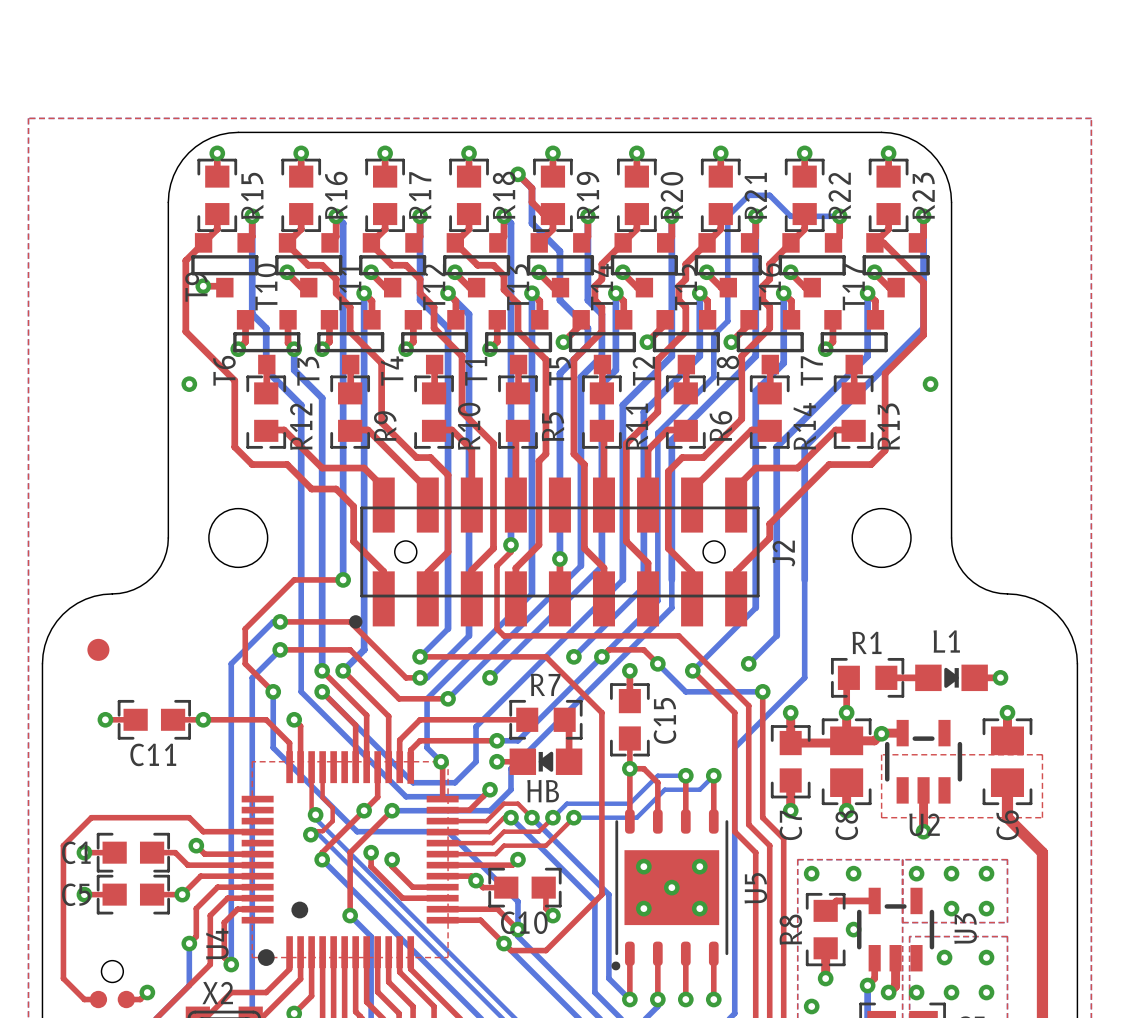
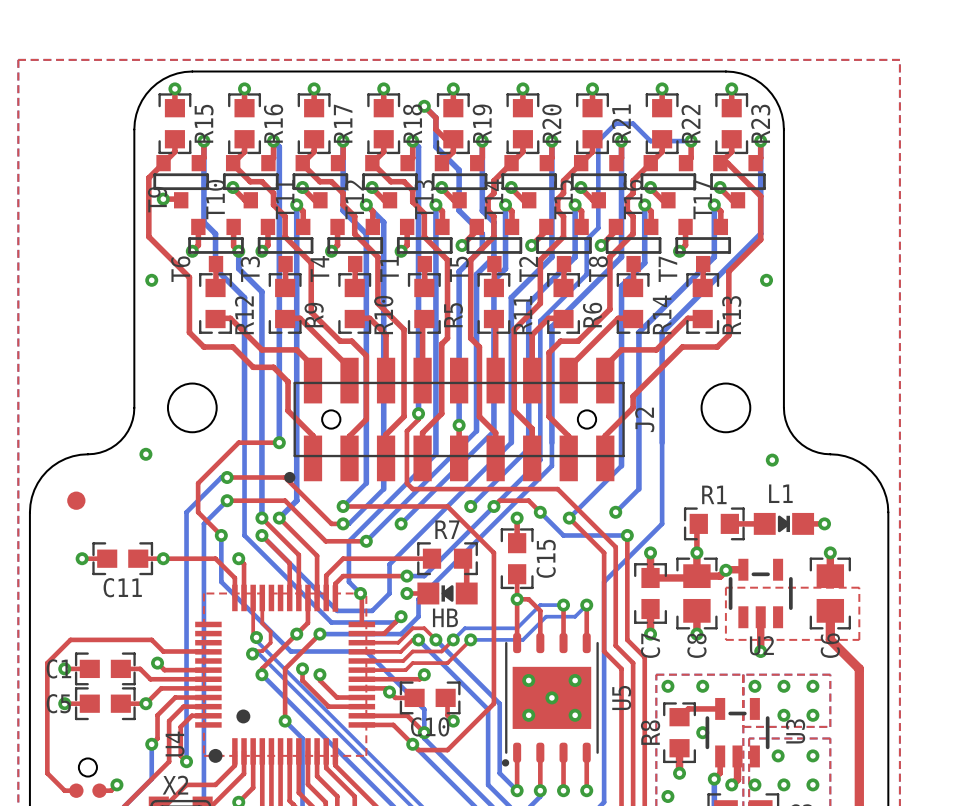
via: none -> (145, 454)
via: none -> (772, 460)

